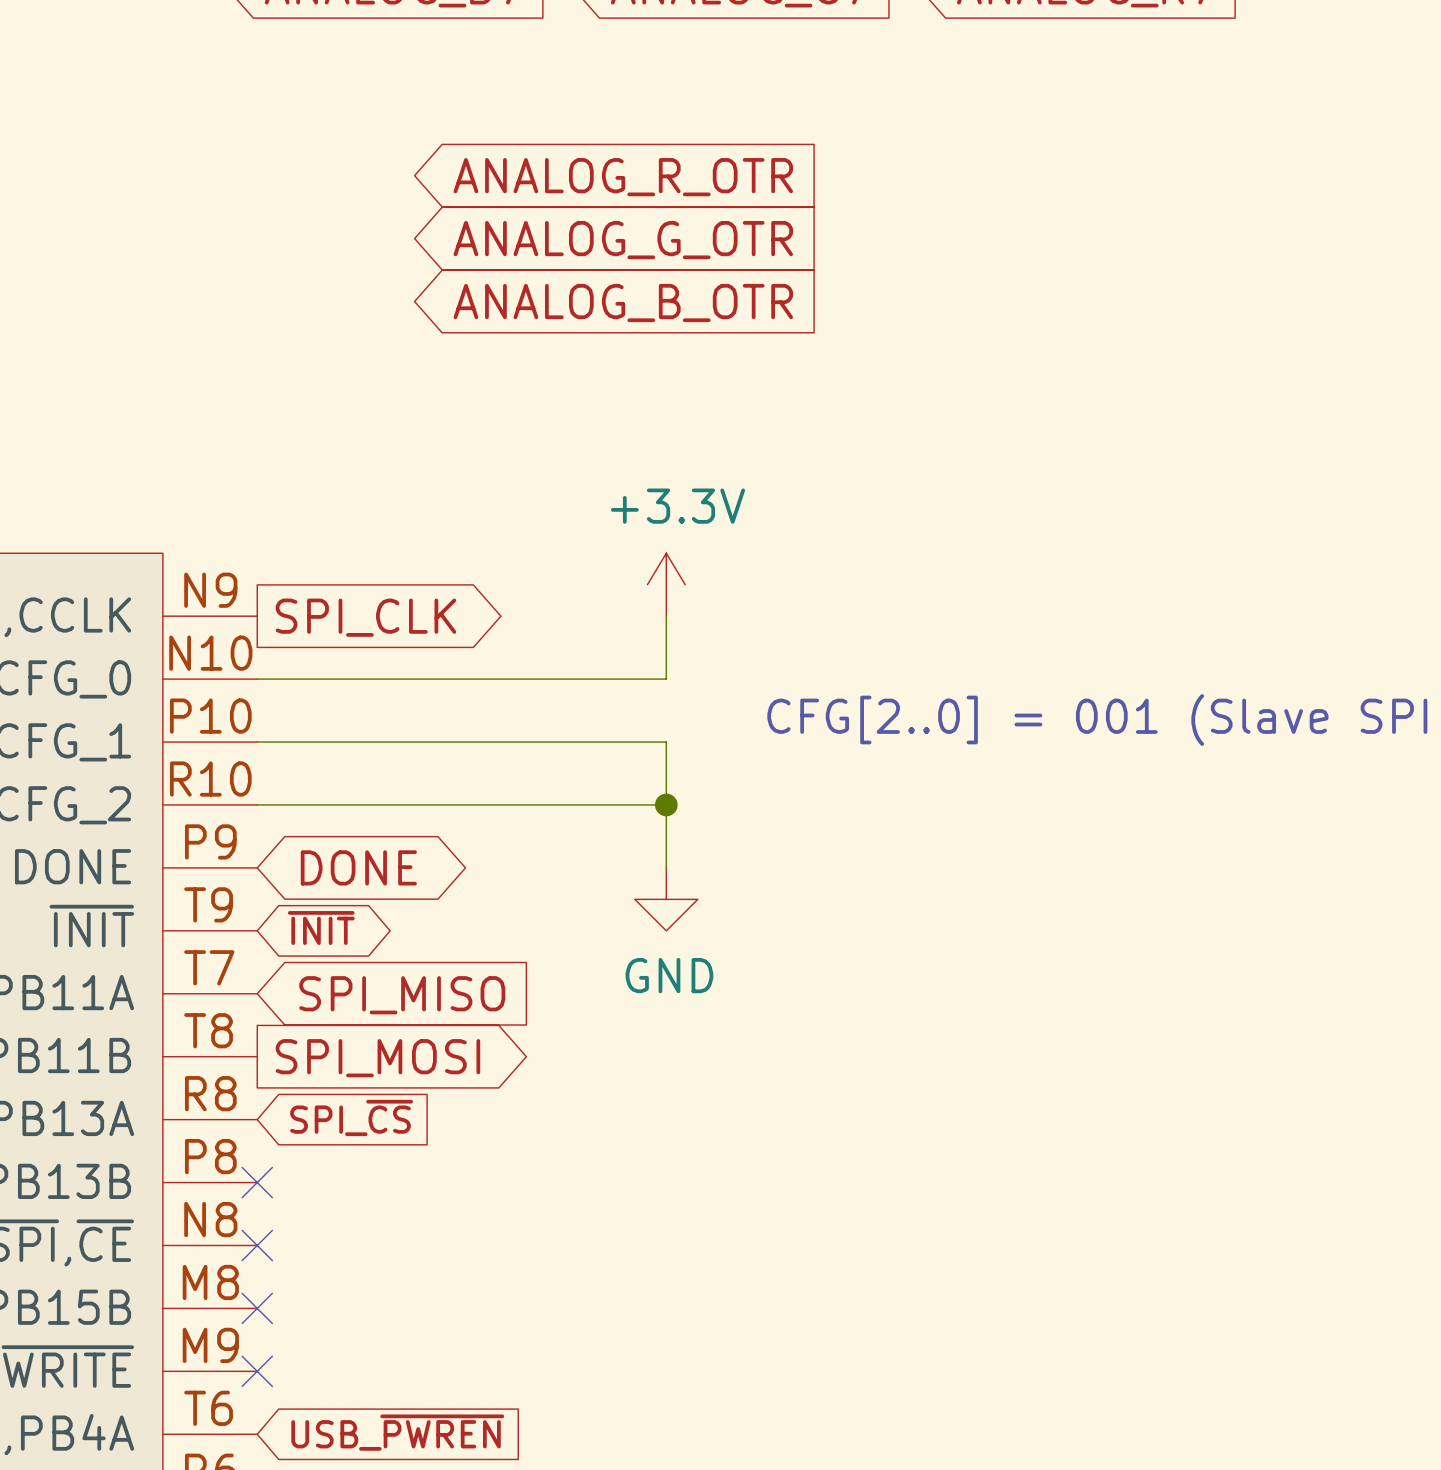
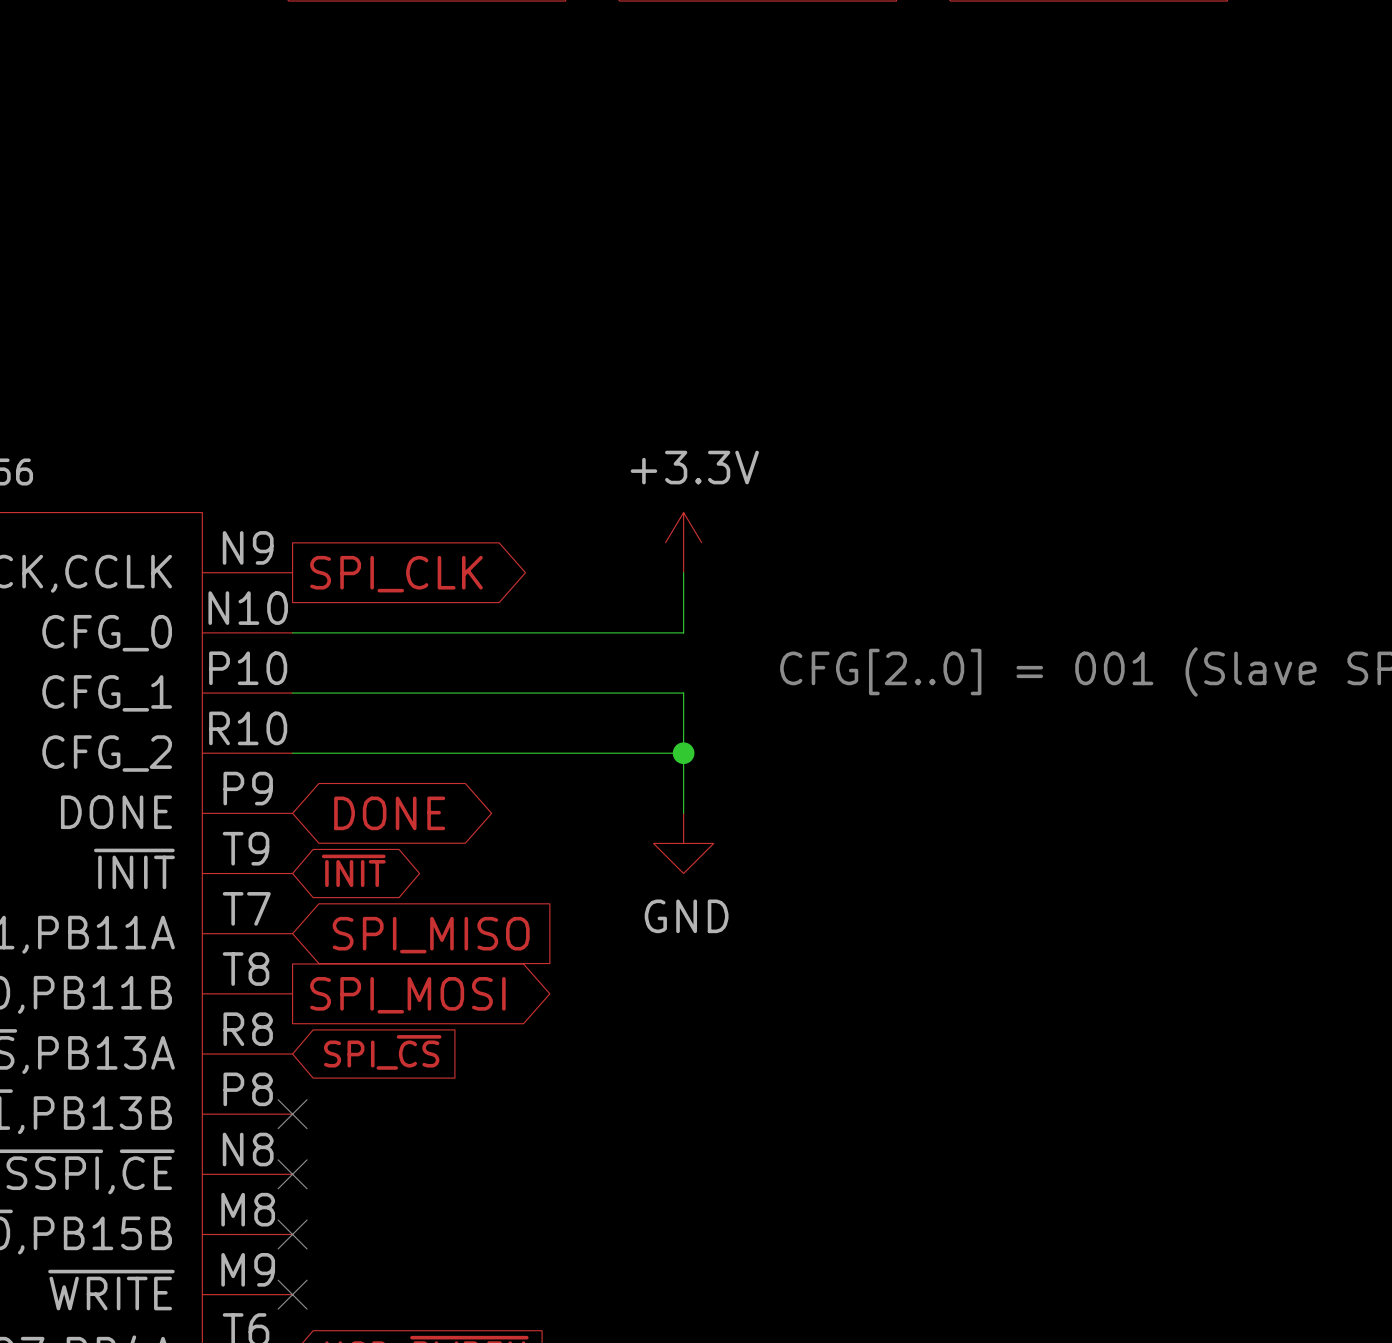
global label: ANALOG_R_OTR (623, 177) -> none
global label: ANALOG_G_OTR (623, 240) -> none
global label: ANALOG_B_OTR (623, 303) -> none

